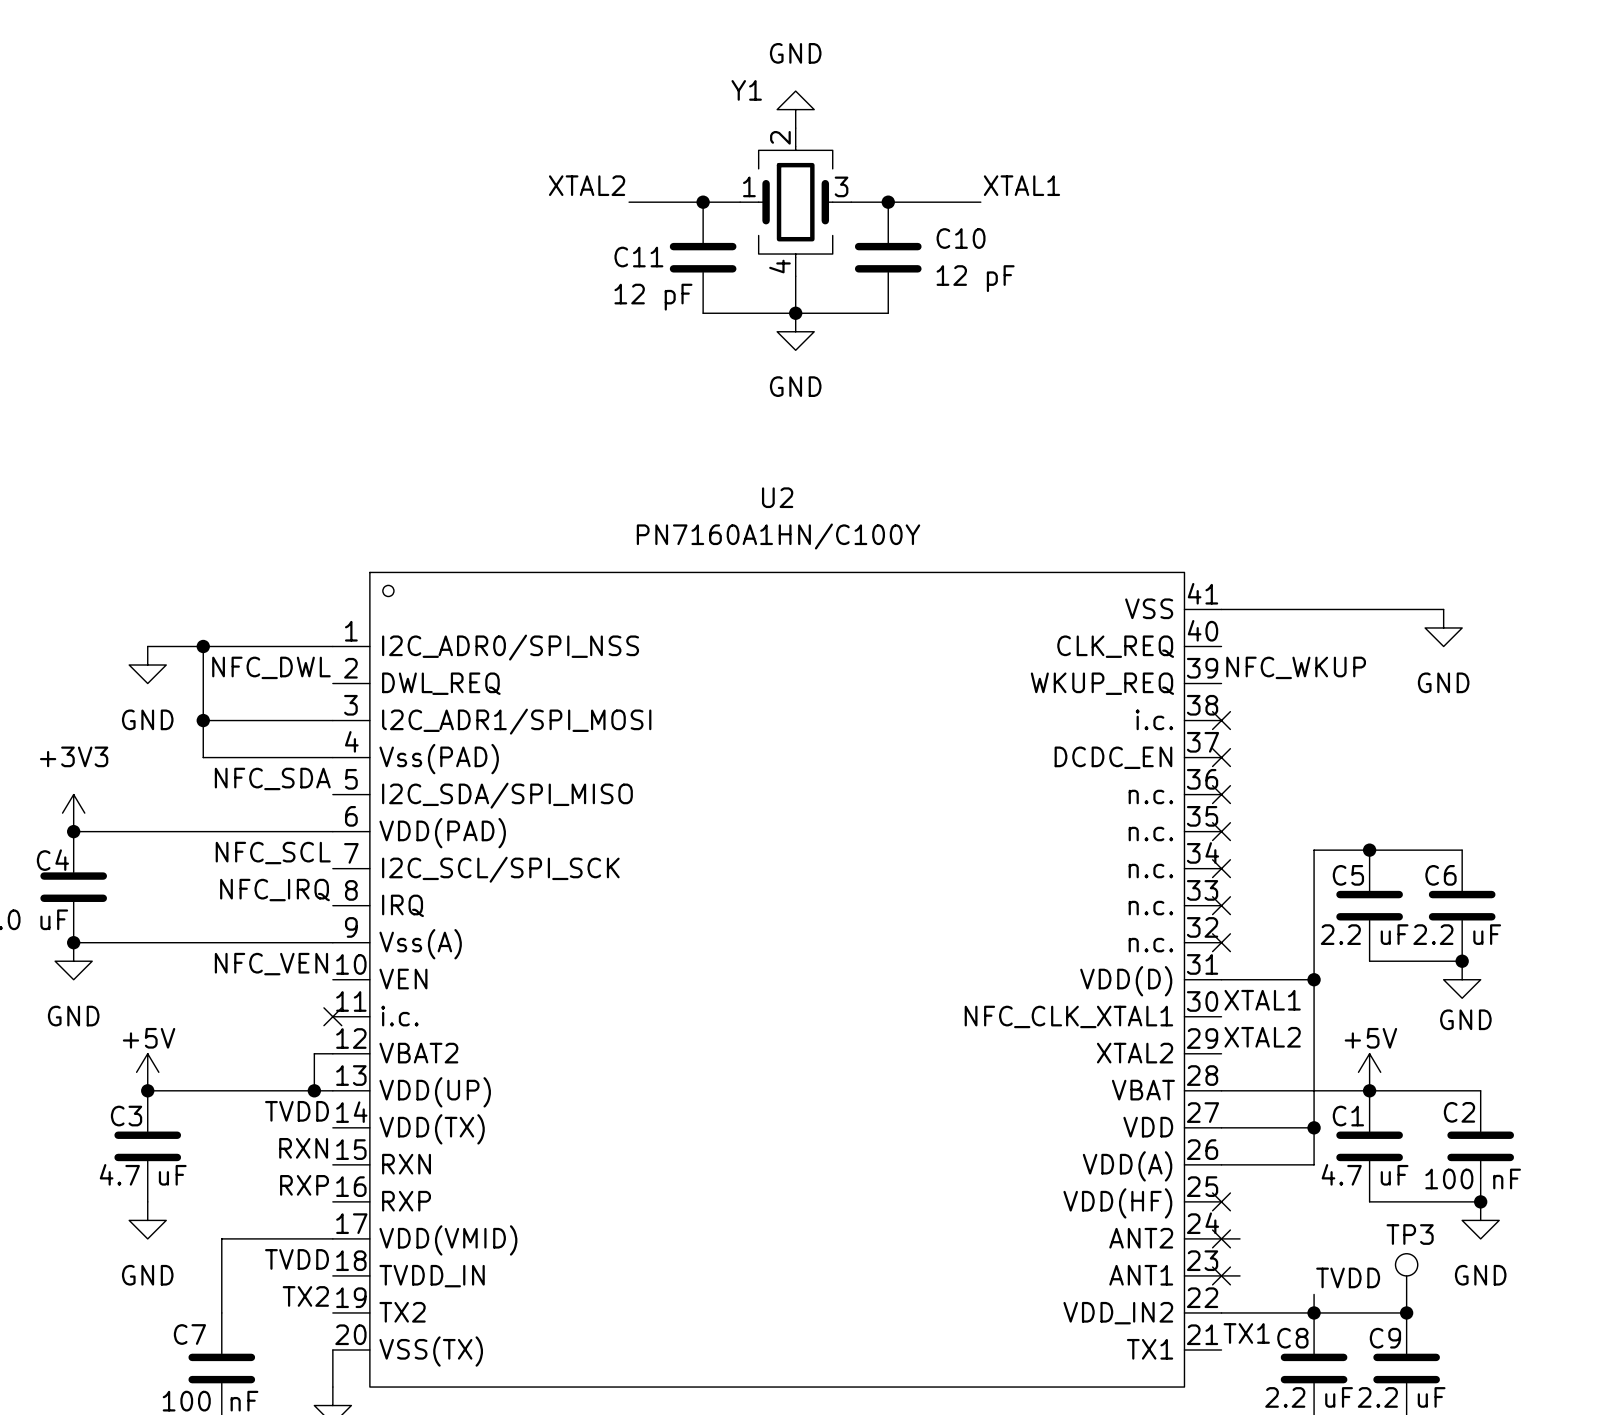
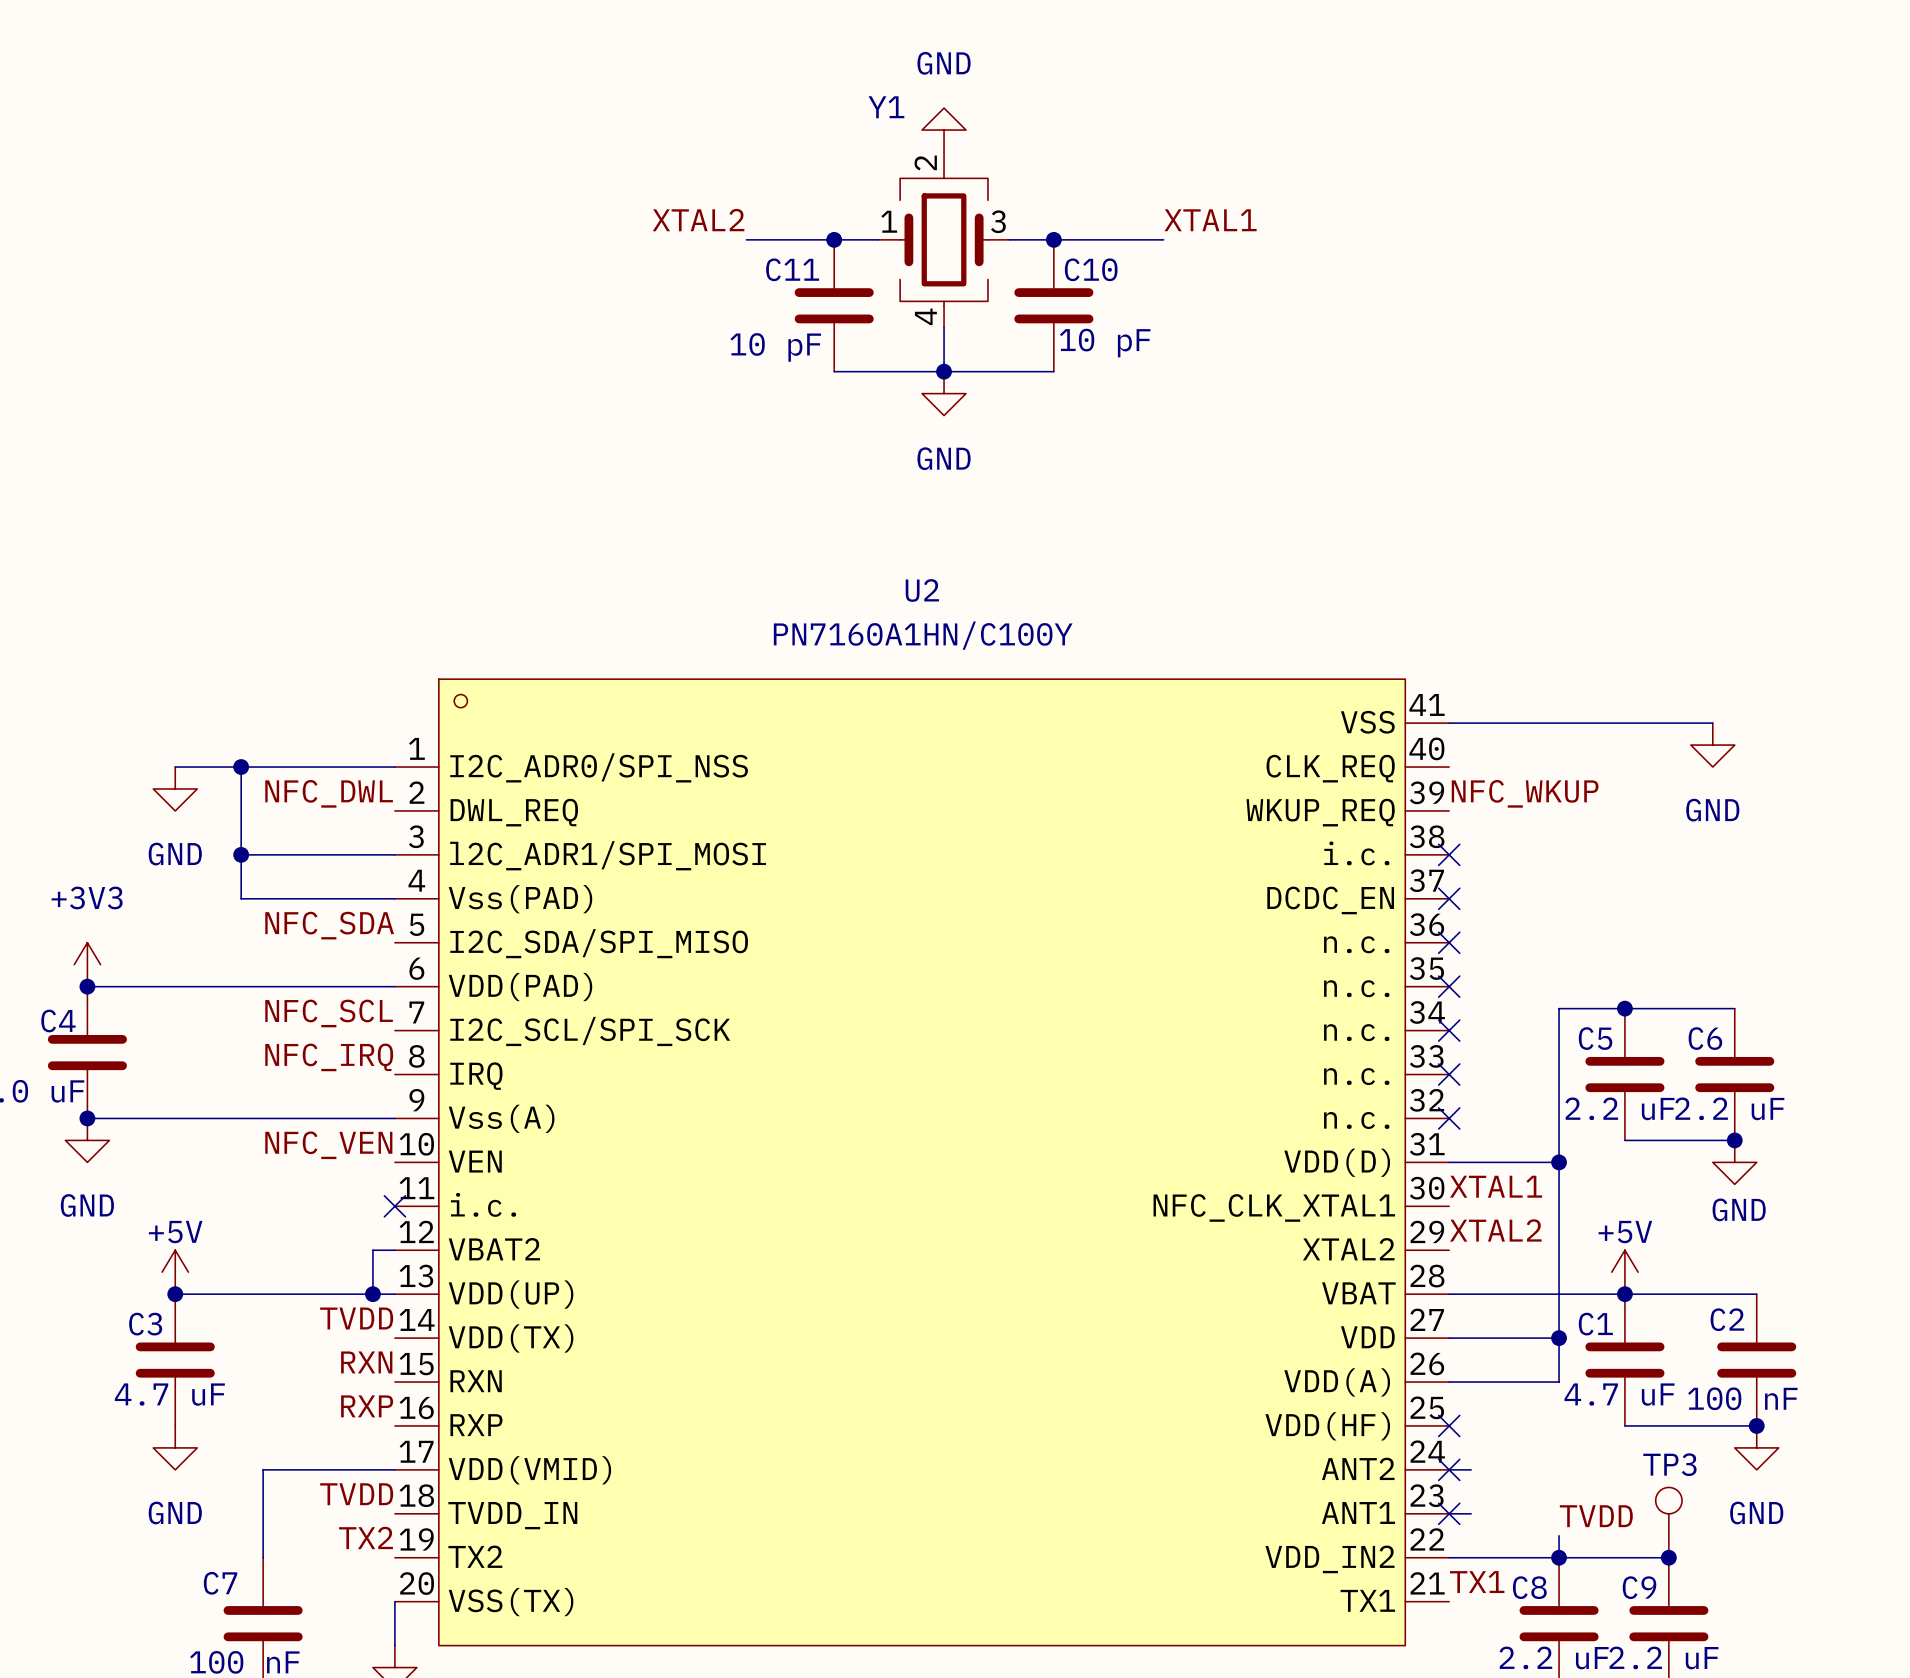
C10 name position: C10 (961, 238) -> C10 (1091, 269)
C11 name position: C11 (638, 257) -> C11 (792, 269)
C10 value: 12 pF (975, 278) -> 10 pF (1105, 343)
C11 value: 12 pF (653, 297) -> 10 pF (775, 347)

